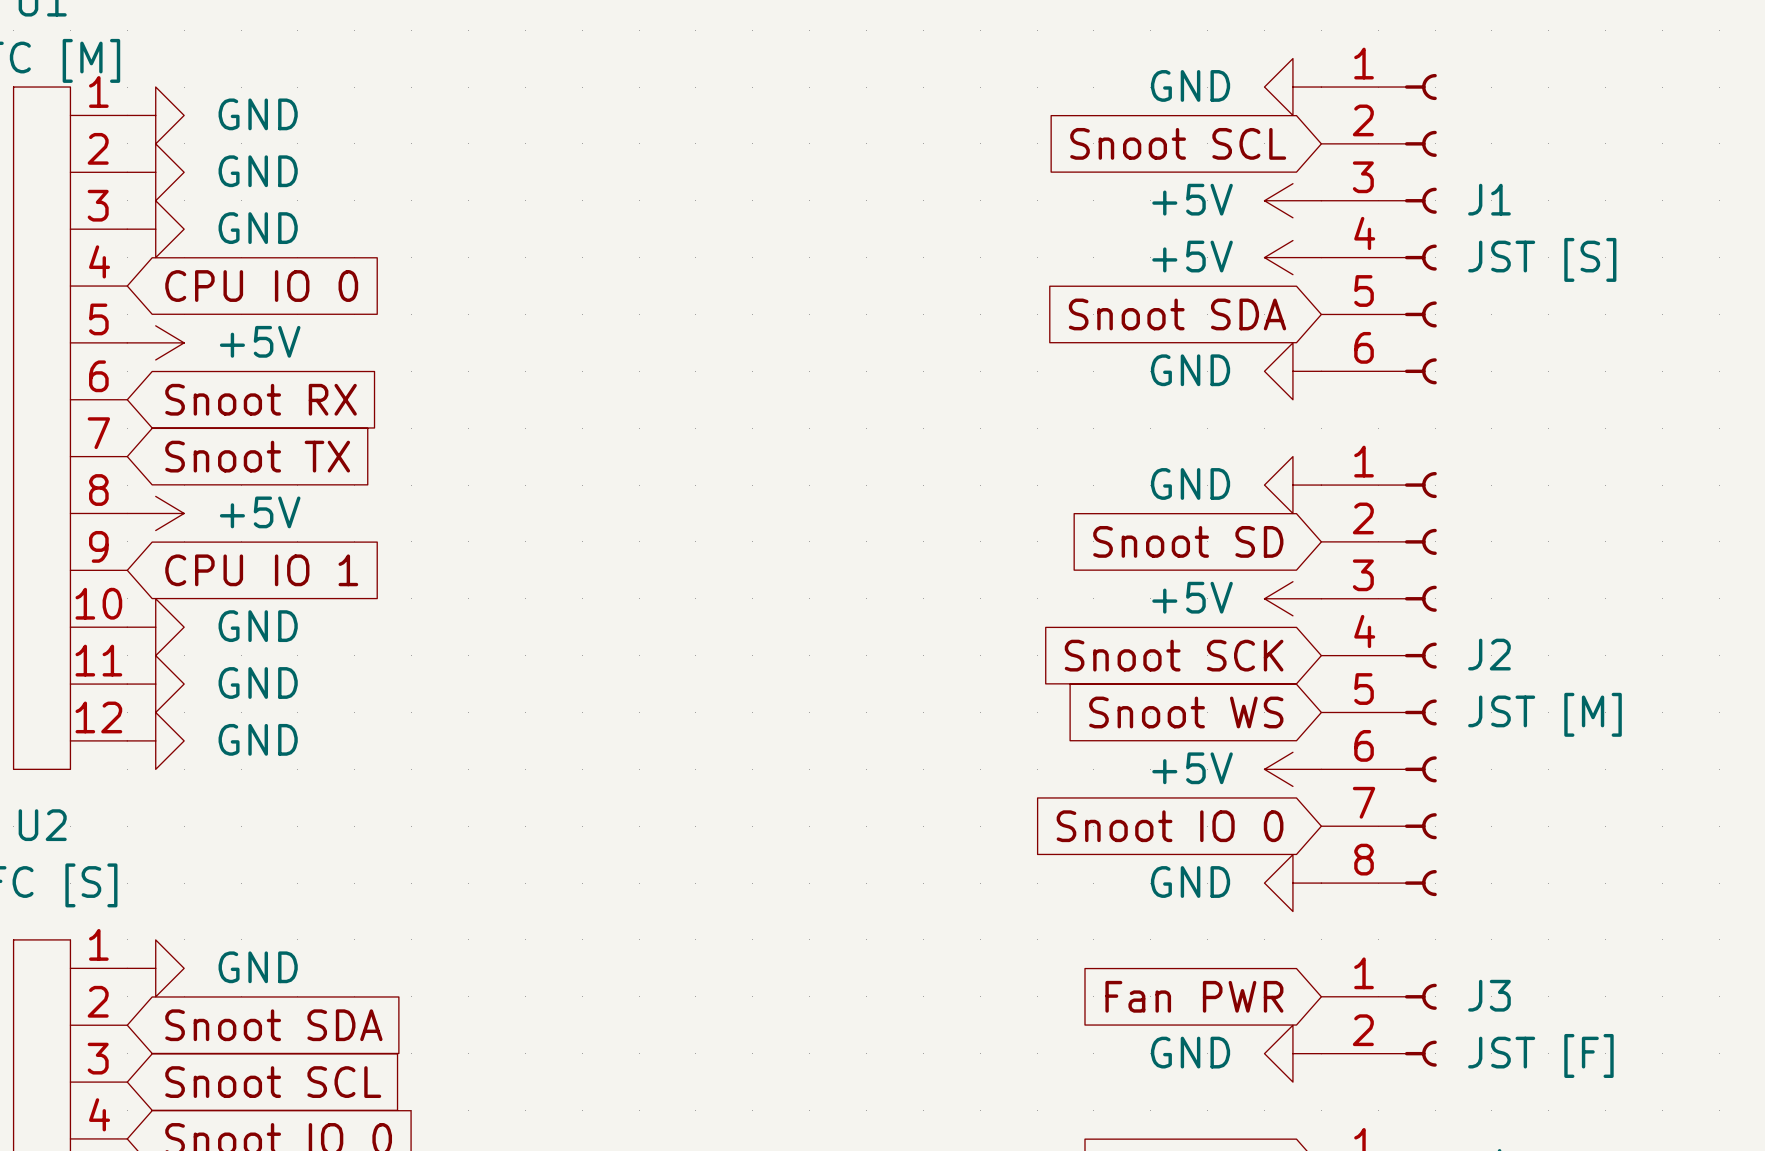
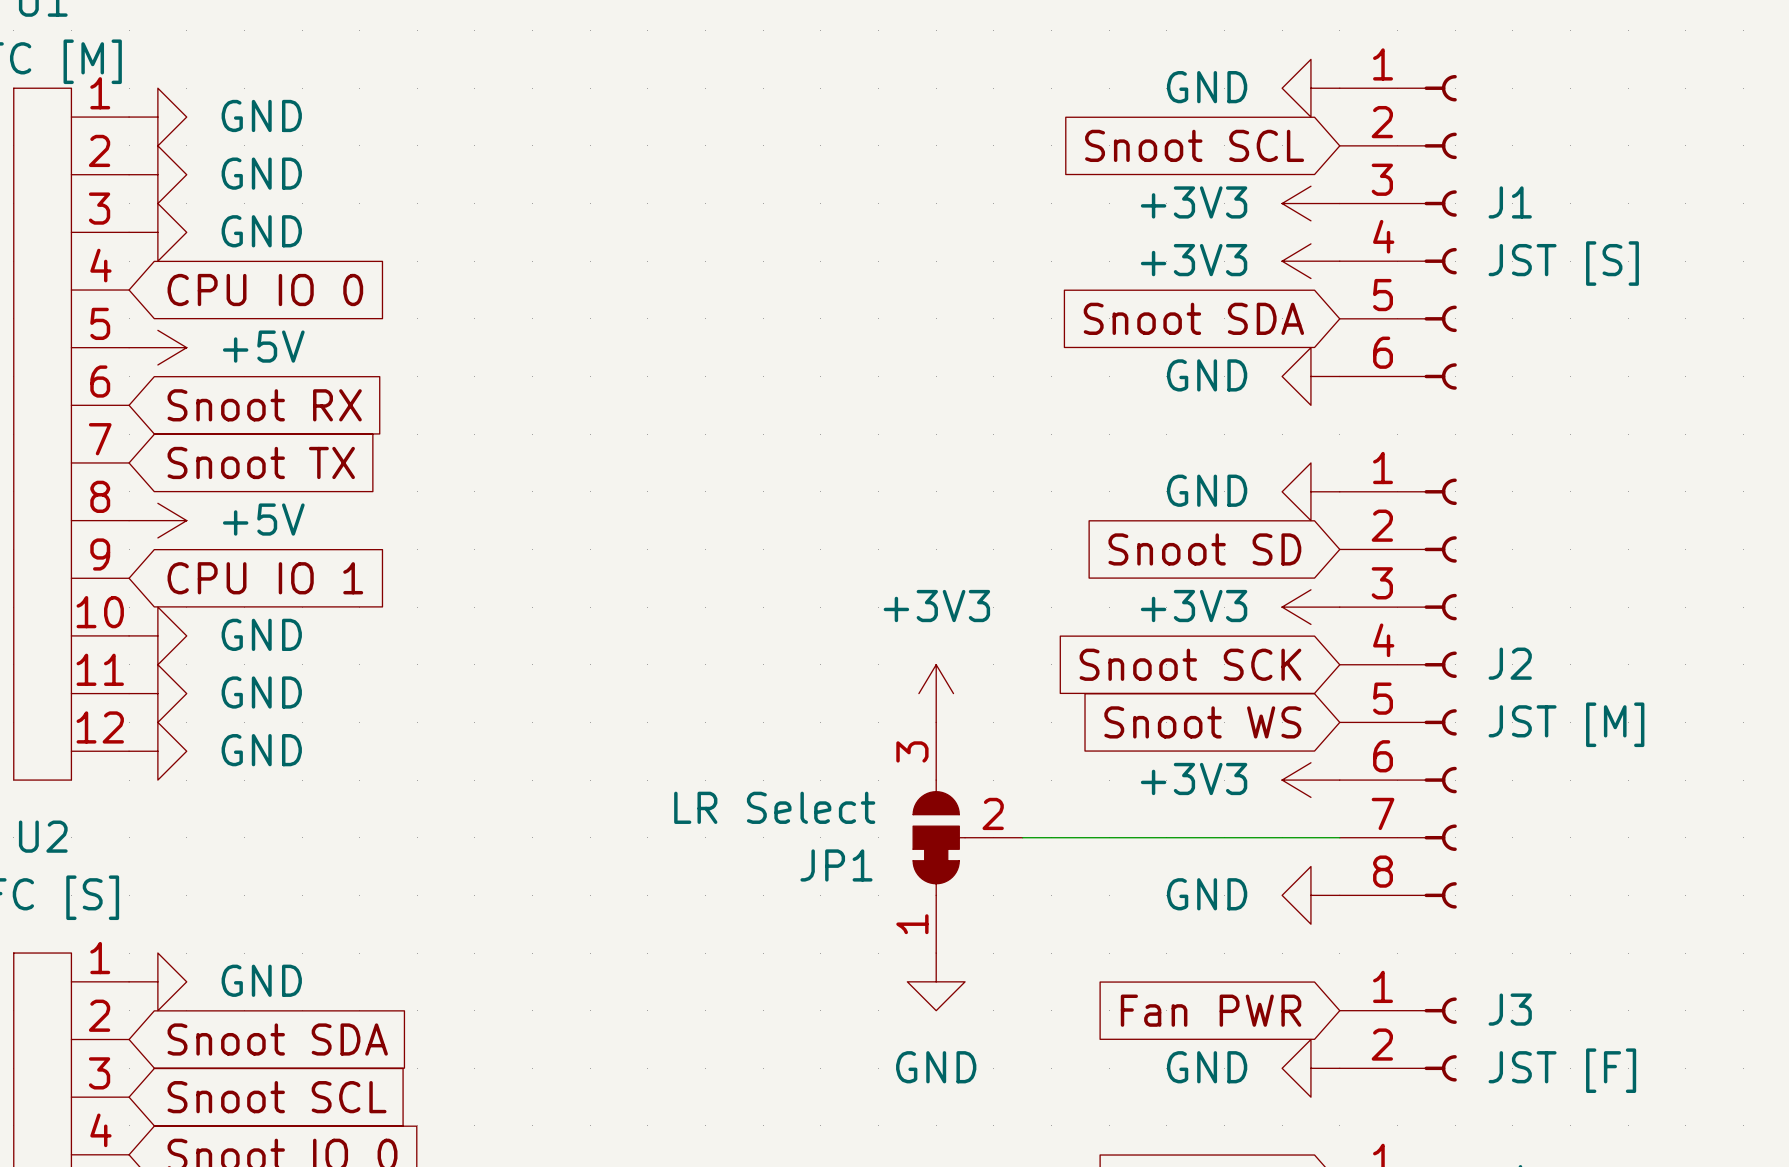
power symbol: +5V (1292, 200) -> +3V3 (1310, 203)
power symbol: +5V (1292, 257) -> +3V3 (1310, 261)
power symbol: +5V (1292, 598) -> +3V3 (1310, 607)
power symbol: none -> +3V3 (936, 693)
power symbol: +5V (1292, 769) -> +3V3 (1310, 780)
JP1: none -> LR Select (967, 837)
wire: none -> (1022, 837) (1339, 837)
global label: Snoot IO 0 (1170, 826) -> none
power symbol: none -> GND (936, 981)

